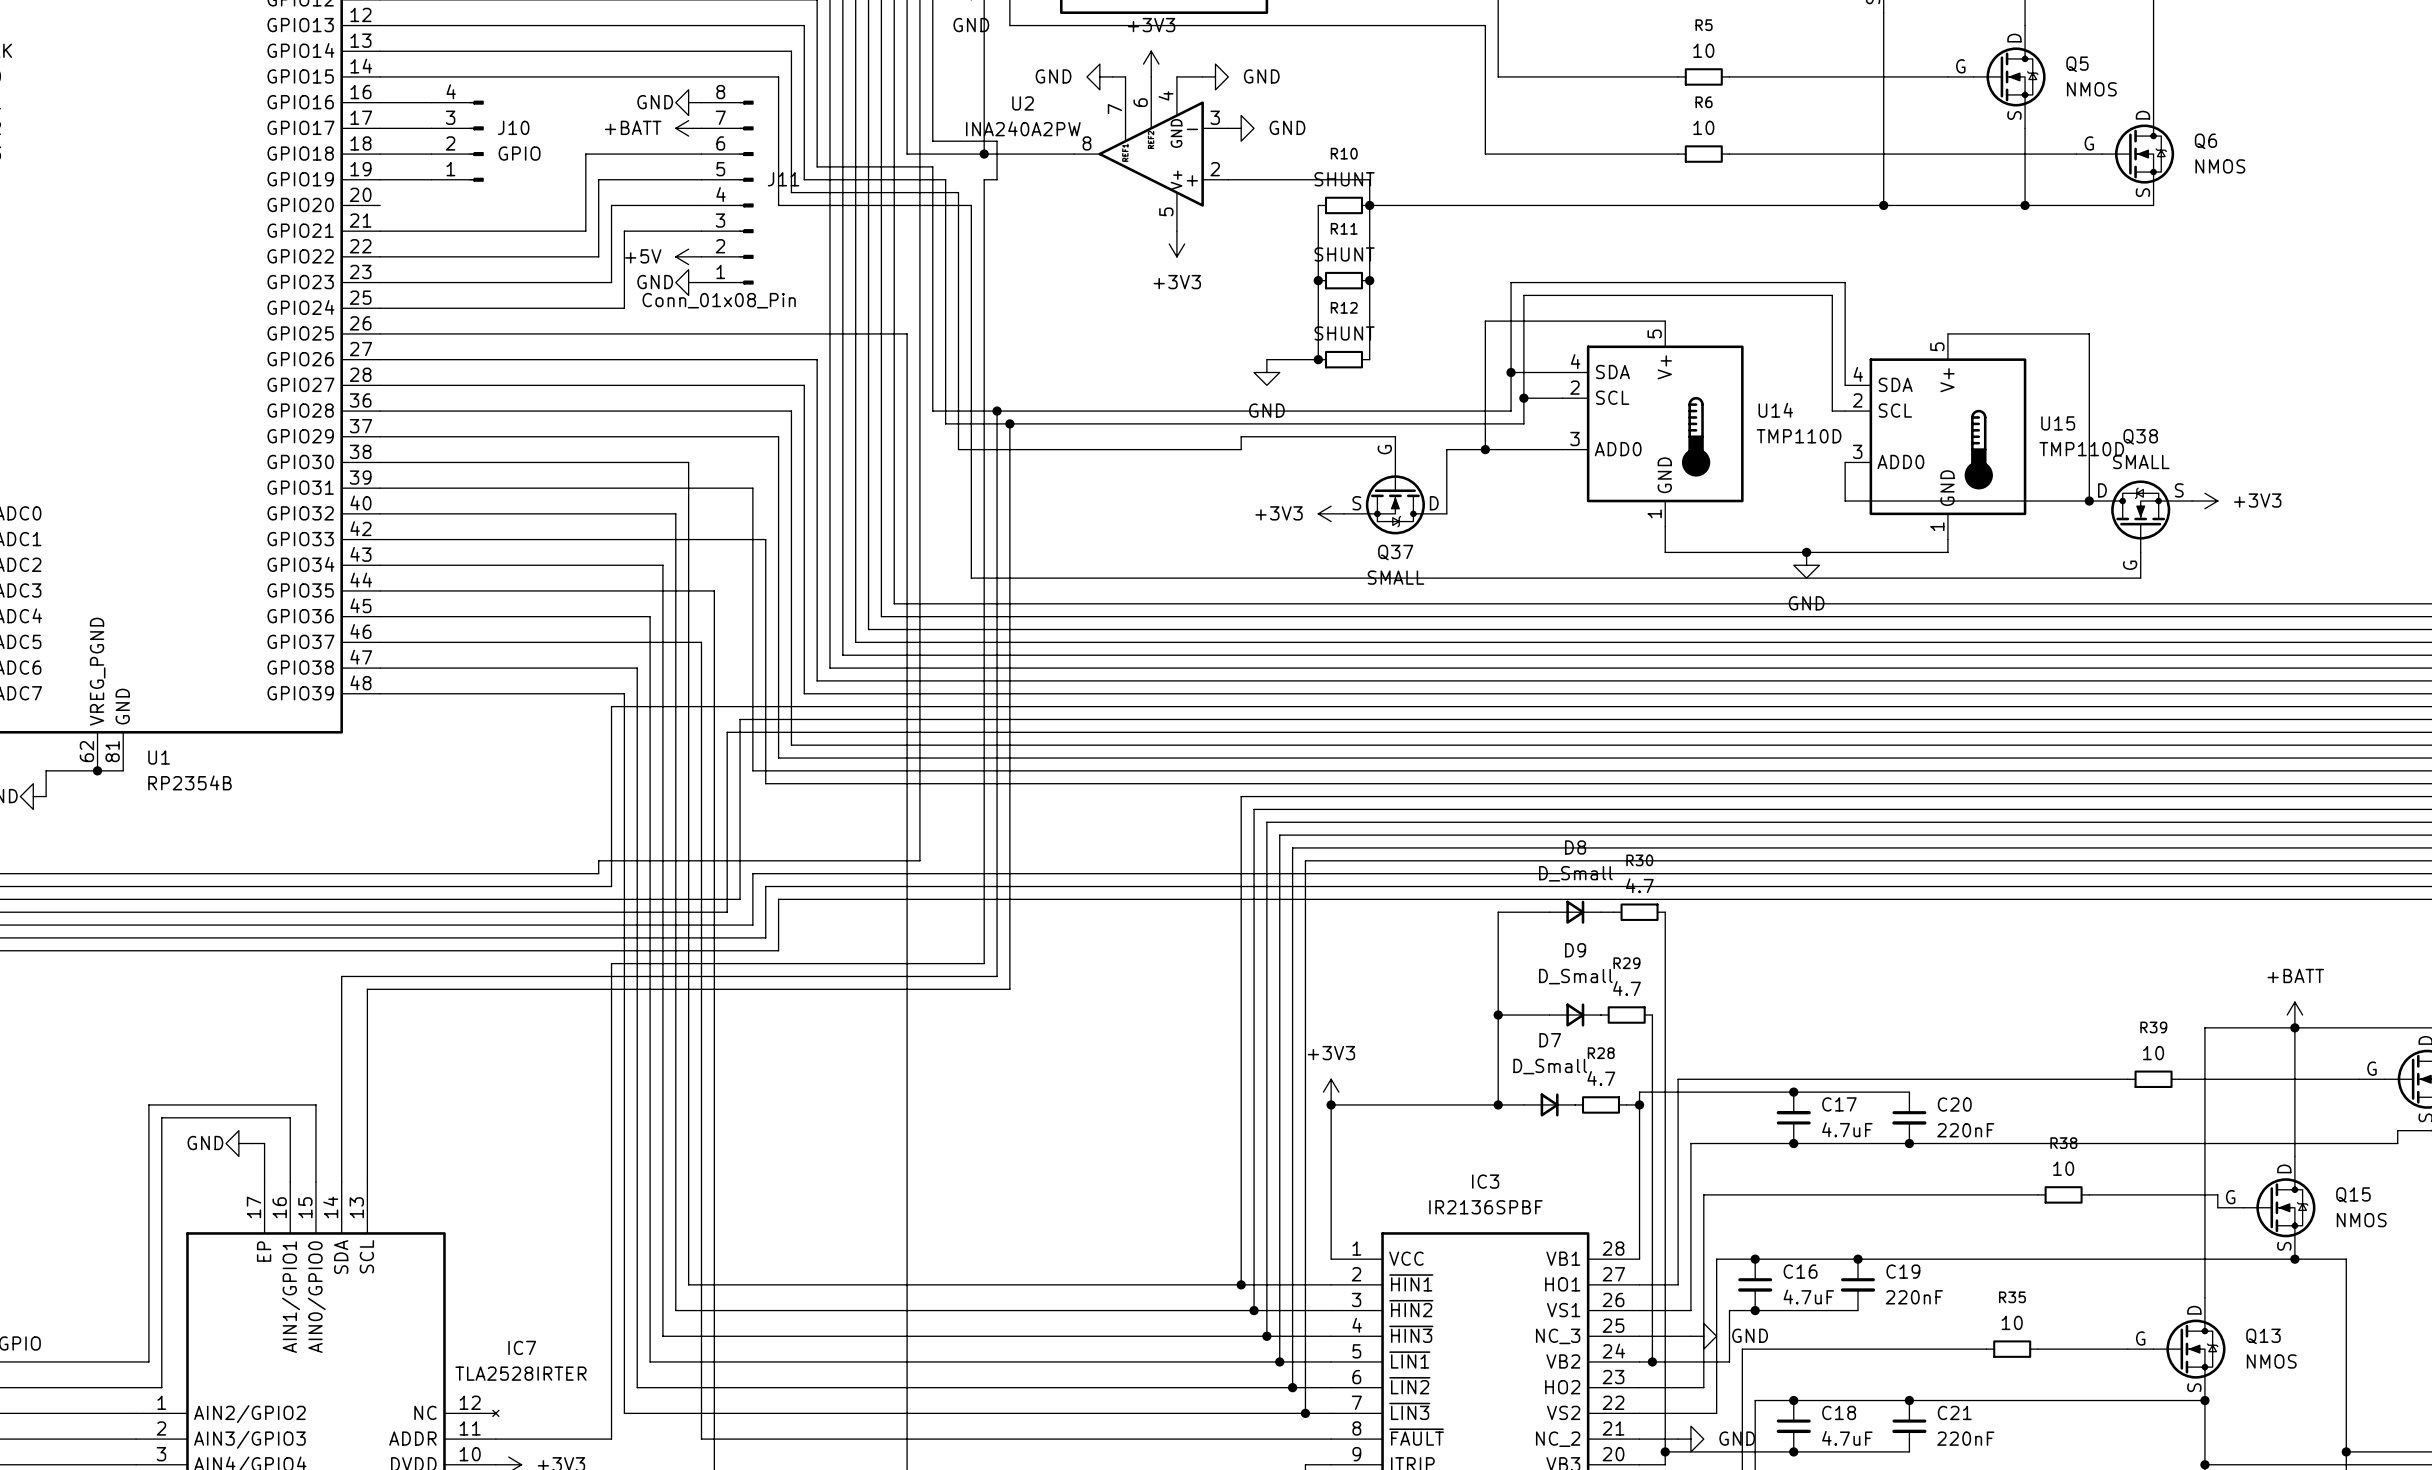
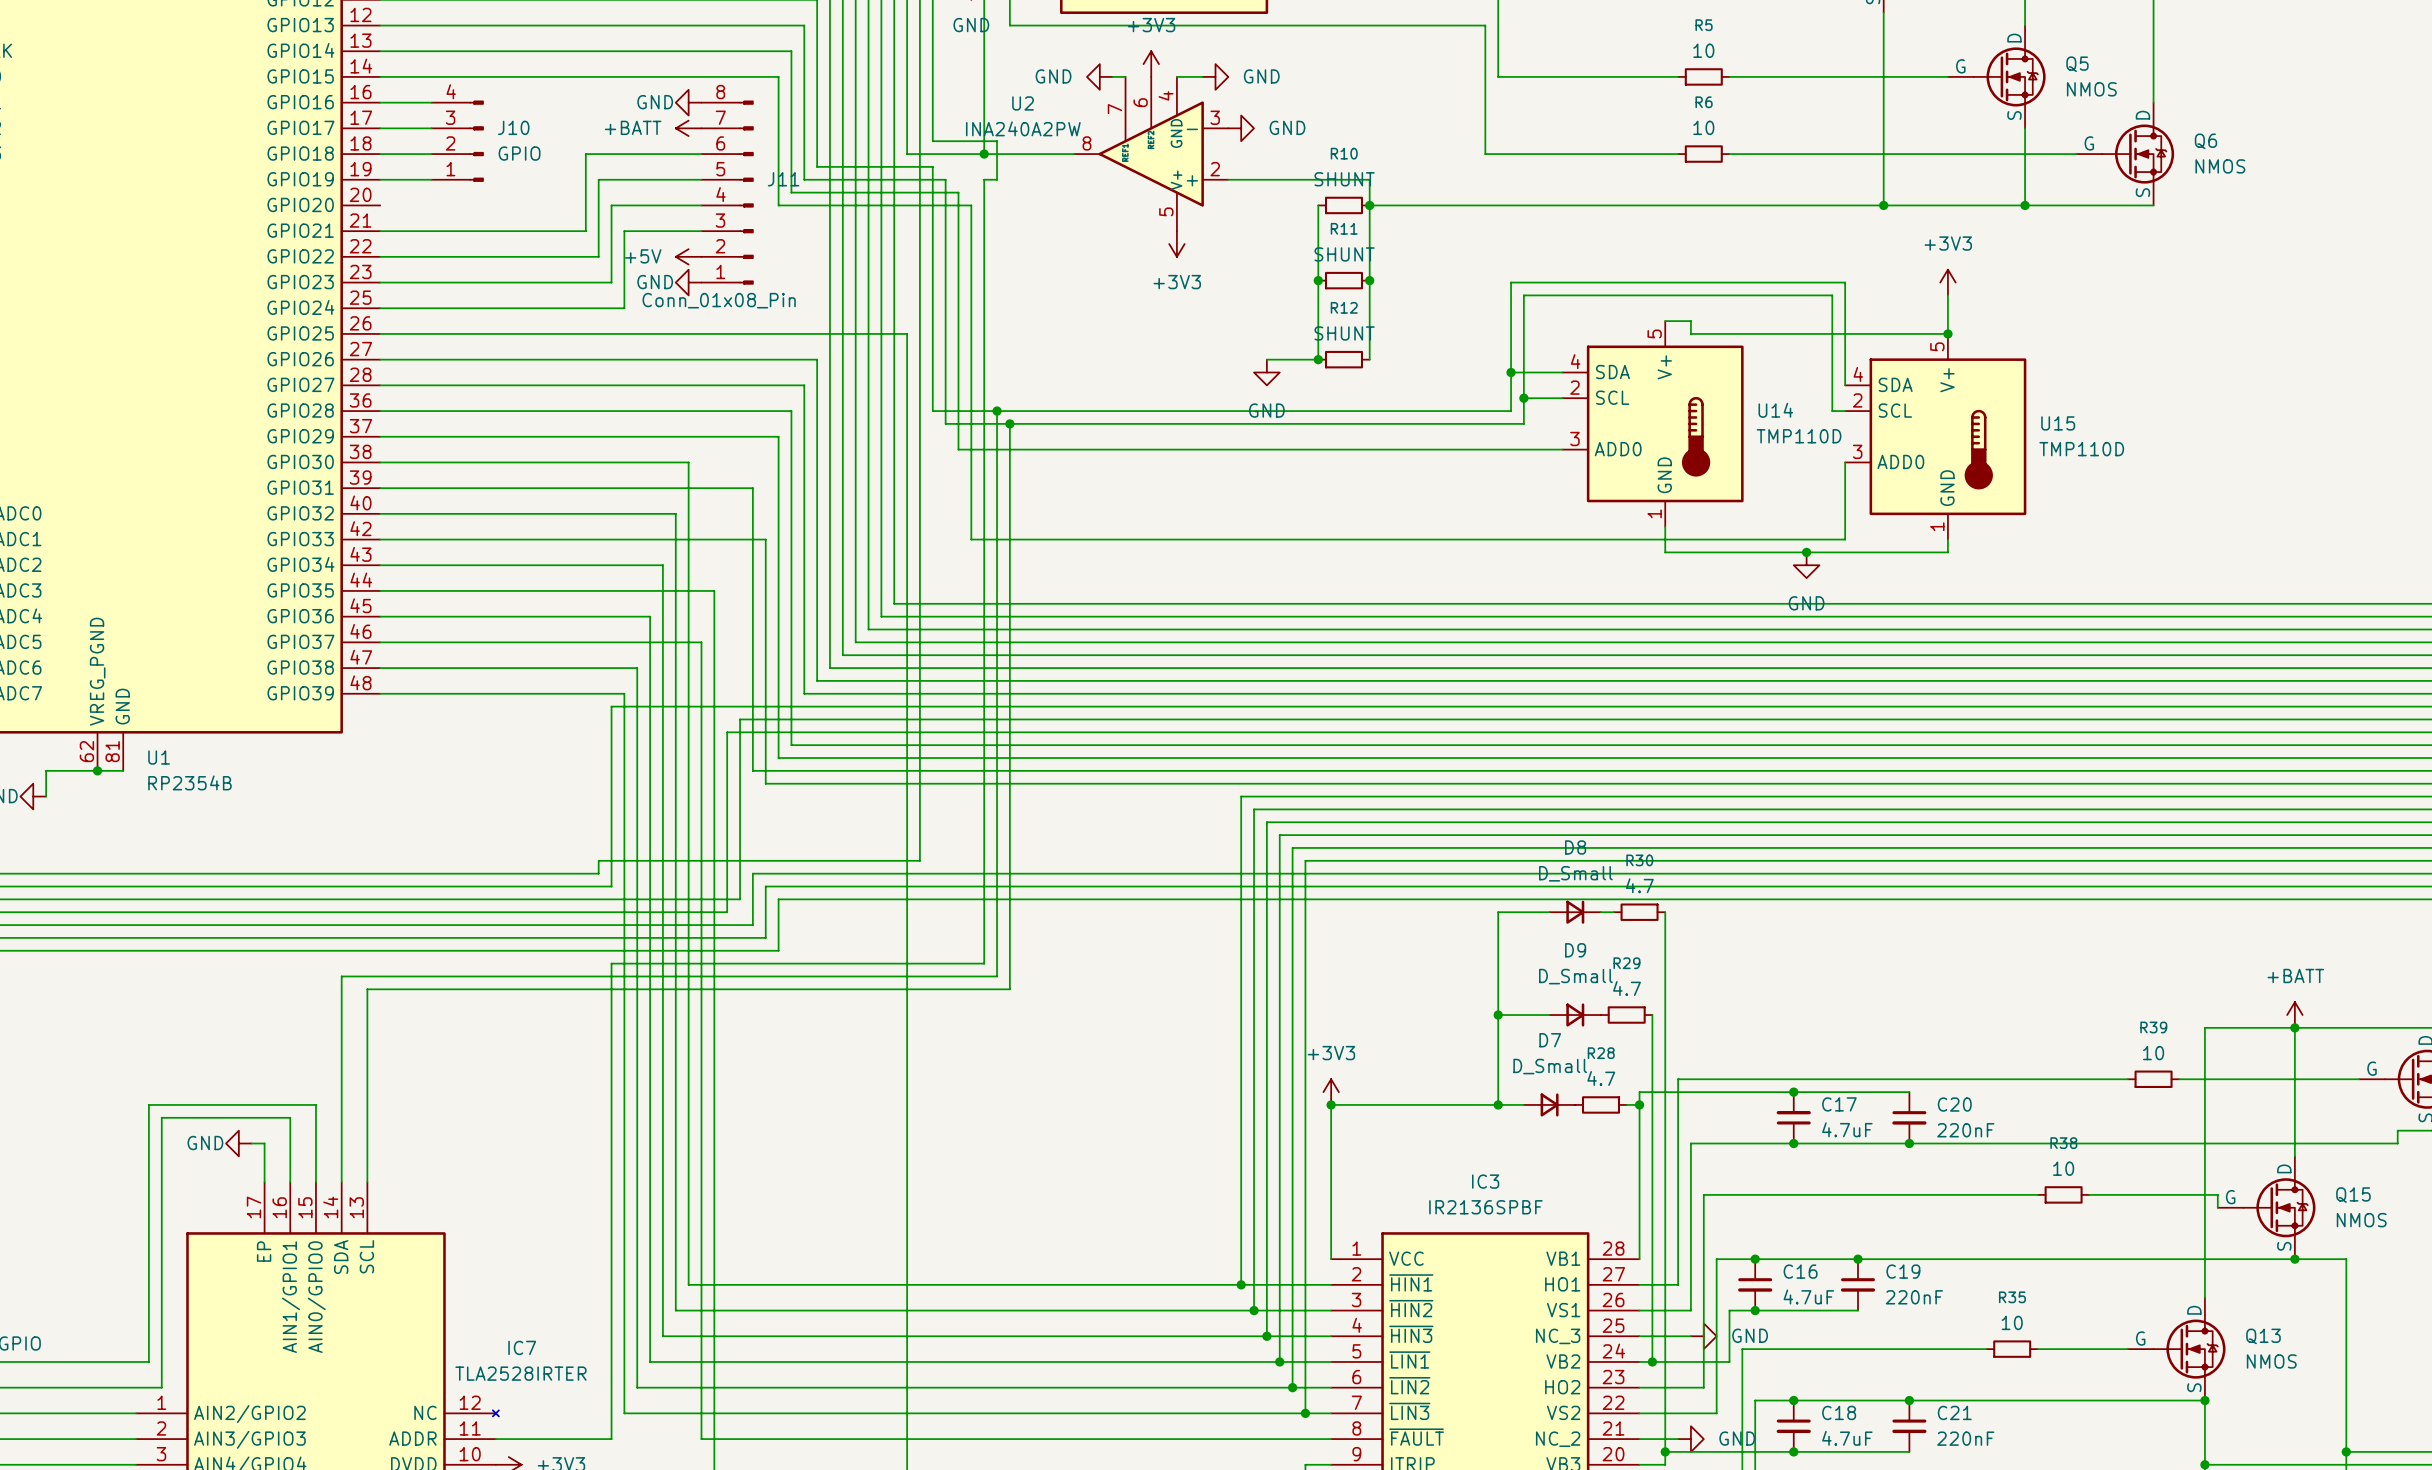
power symbol: none -> +3V3 (1947, 282)
wire: (1665, 321) (1485, 321) (1485, 449) -> (1665, 321) (1690, 321) (1690, 333) (1947, 333) (1947, 295)
wire: (1947, 333) (2089, 333) (2089, 501) (1845, 501) -> none
junction: none -> (1947, 333)
wire: (1395, 436) (1241, 436) (1241, 449) -> (1446, 449) (1241, 449)
wire: (1446, 449) (1446, 513) -> none
junction: (1485, 449) -> none
Q37: SMALL (1395, 485) -> none
junction: (2089, 501) -> none
power symbol: +3V3 (2204, 501) -> none
power symbol: +3V3 (1331, 513) -> none
Q38: SMALL (2140, 529) -> none
wire: (971, 539) (971, 578) (2140, 578) -> (971, 539) (1845, 539) (1845, 501)

